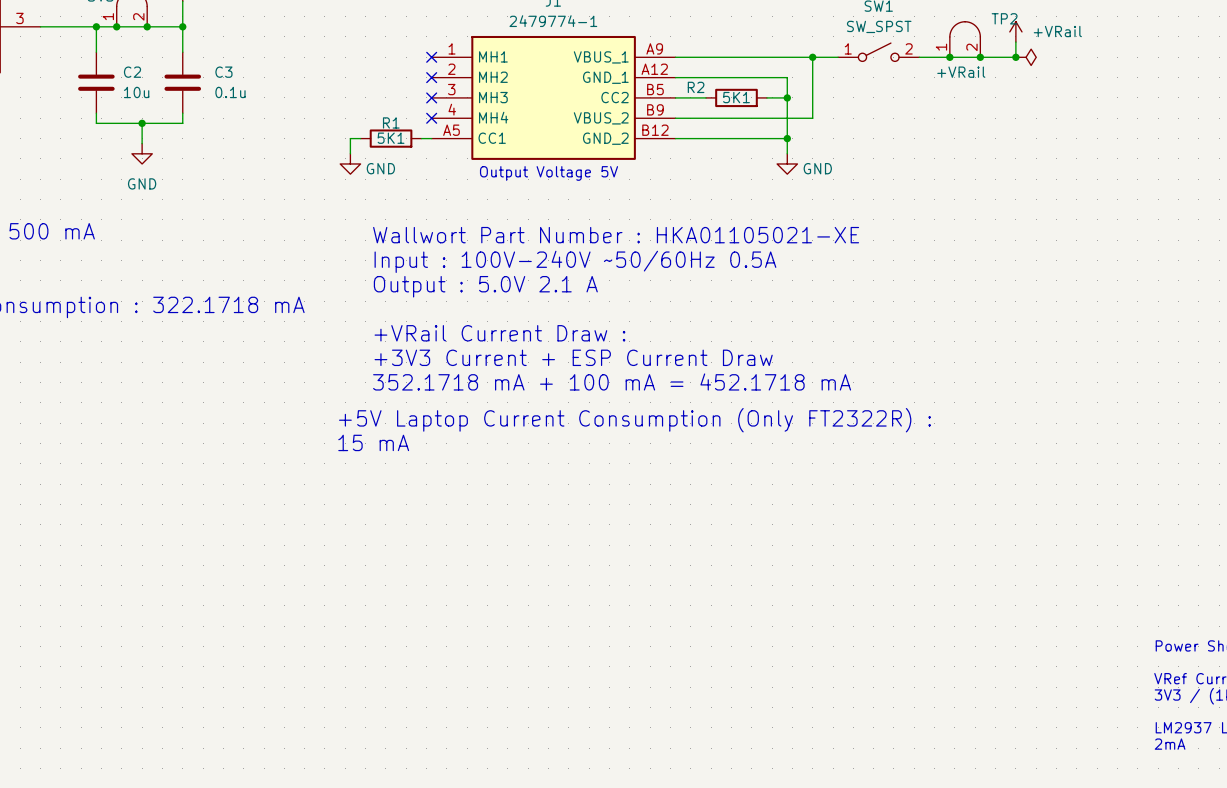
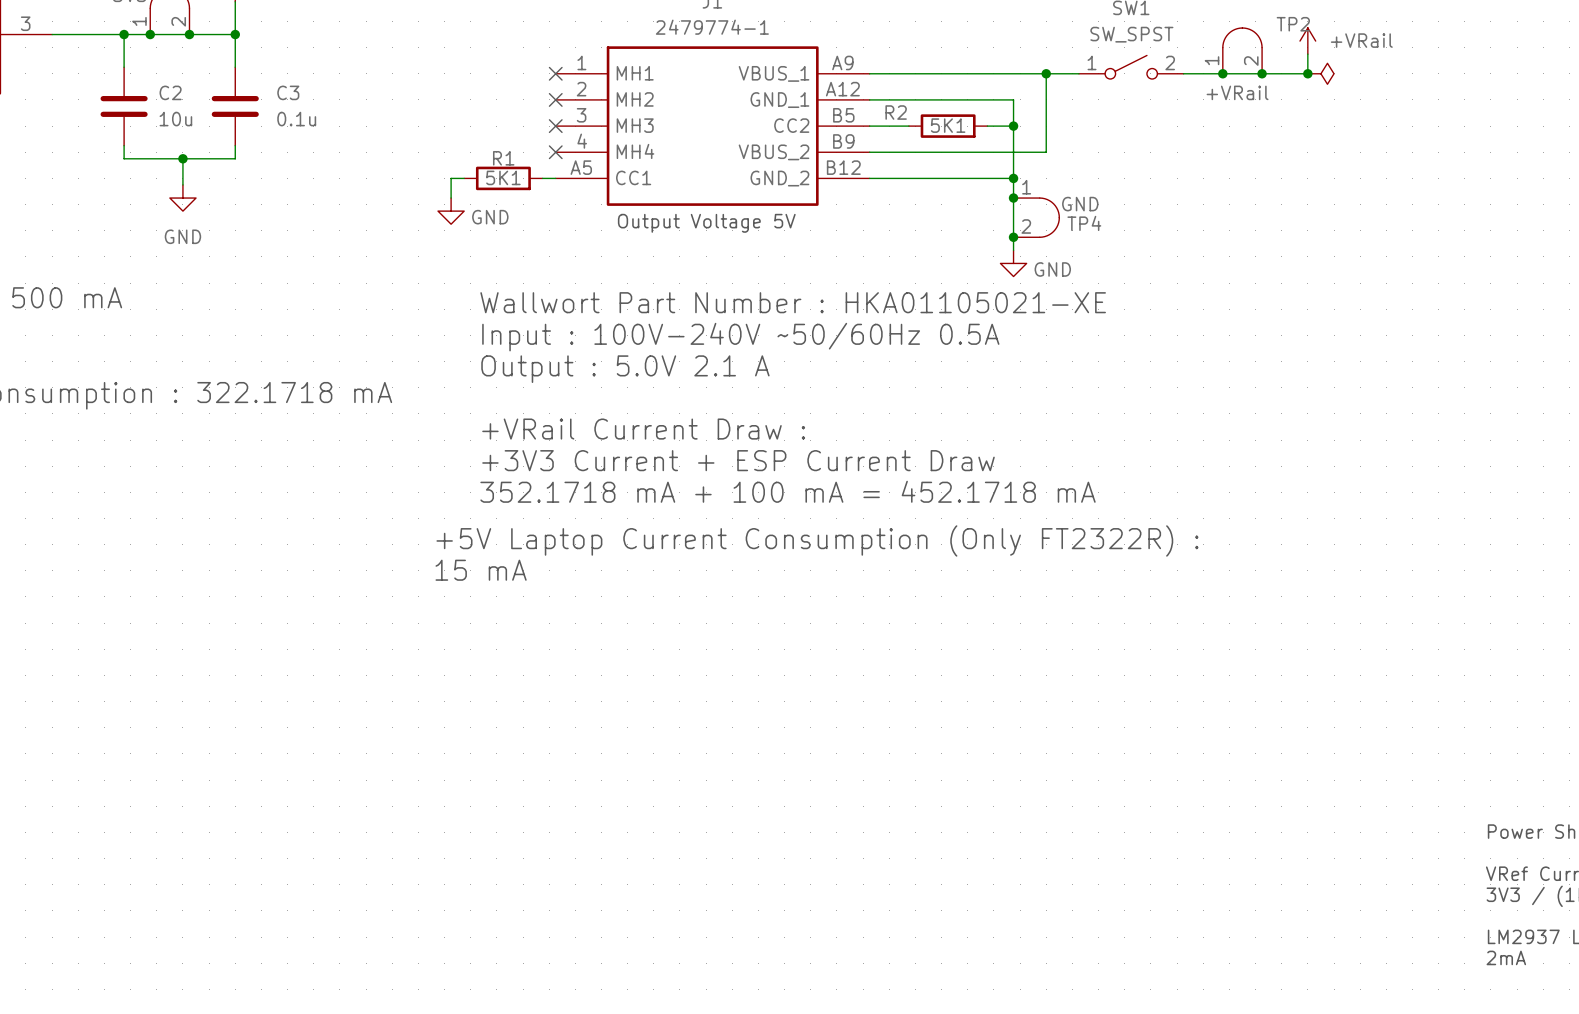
wire: none -> (1013, 198) (1013, 250)
junction: none -> (1013, 198)
power symbol position: GND (787, 163) -> GND (1013, 263)
TP4: none -> GND (1036, 217)
junction: none -> (1013, 237)

